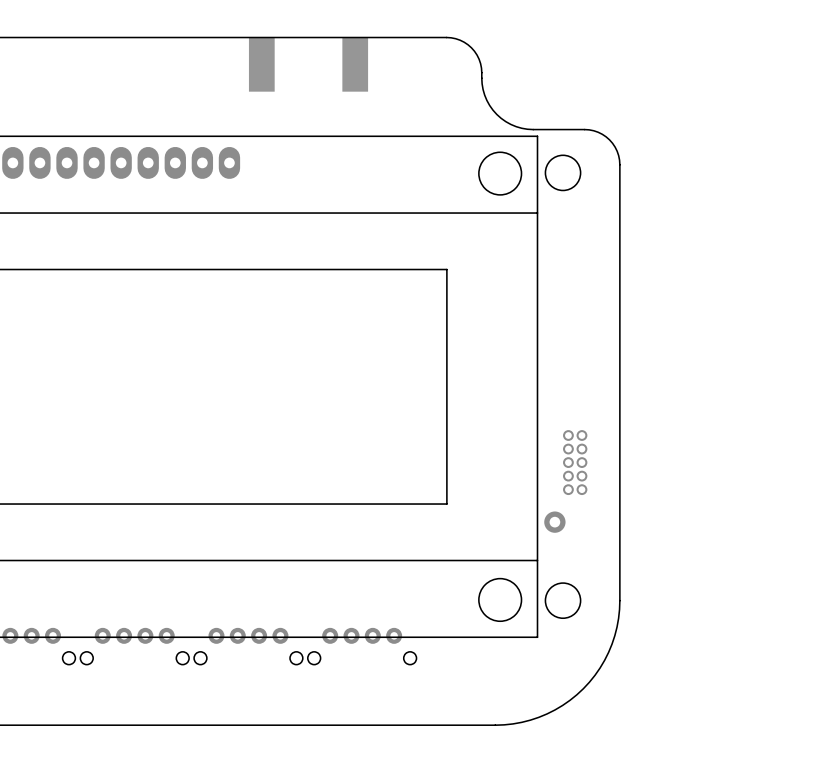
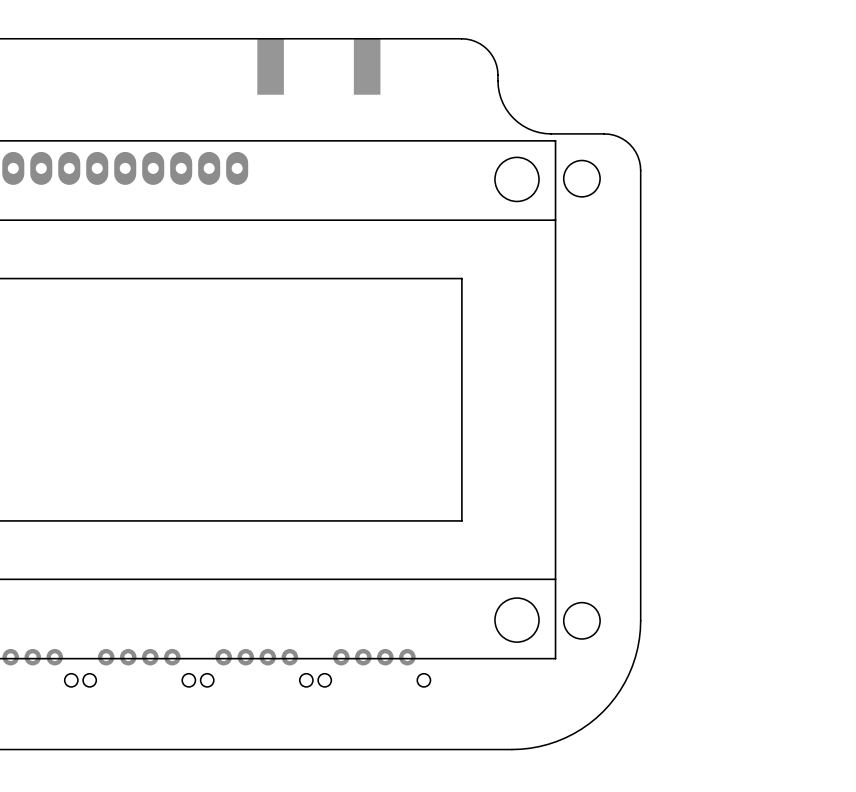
part: (575, 462) -> none
part: (554, 522) -> none

